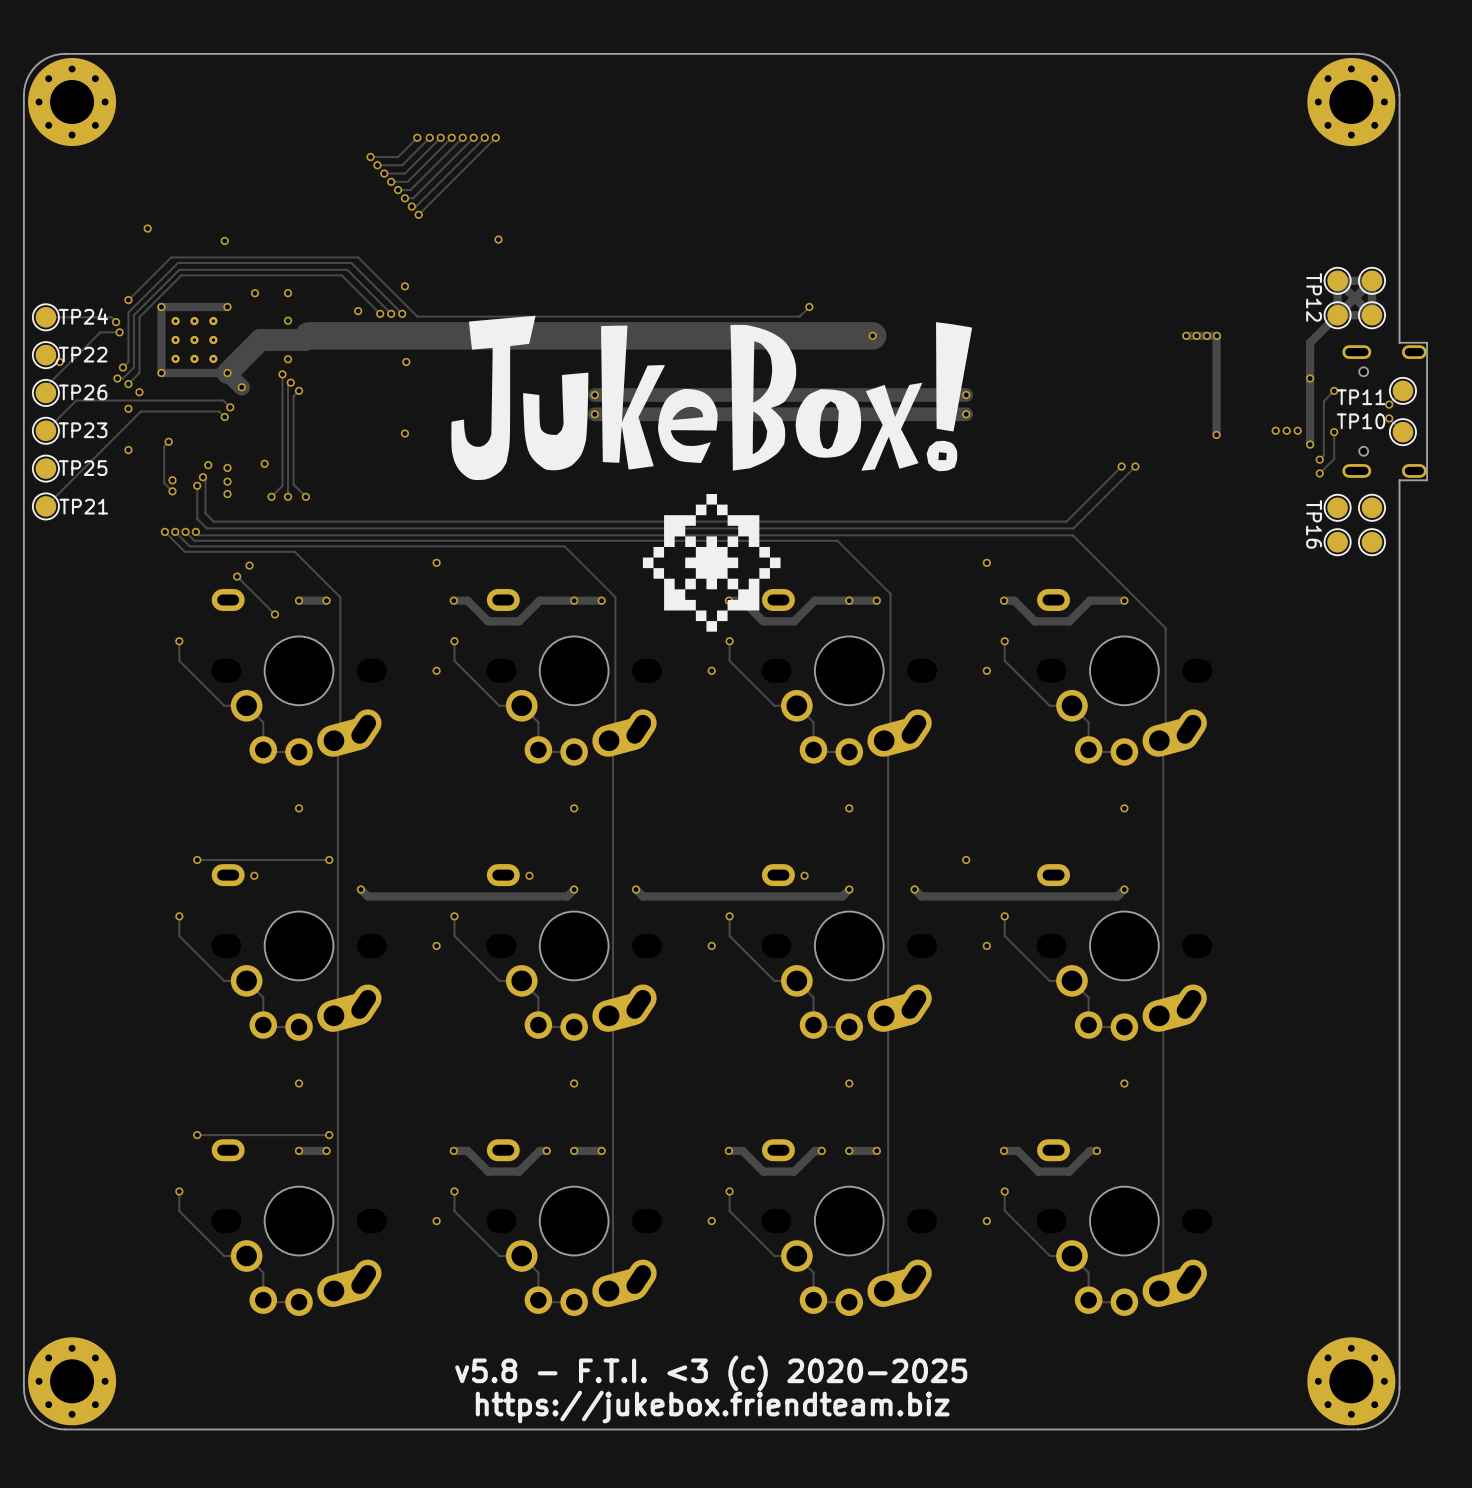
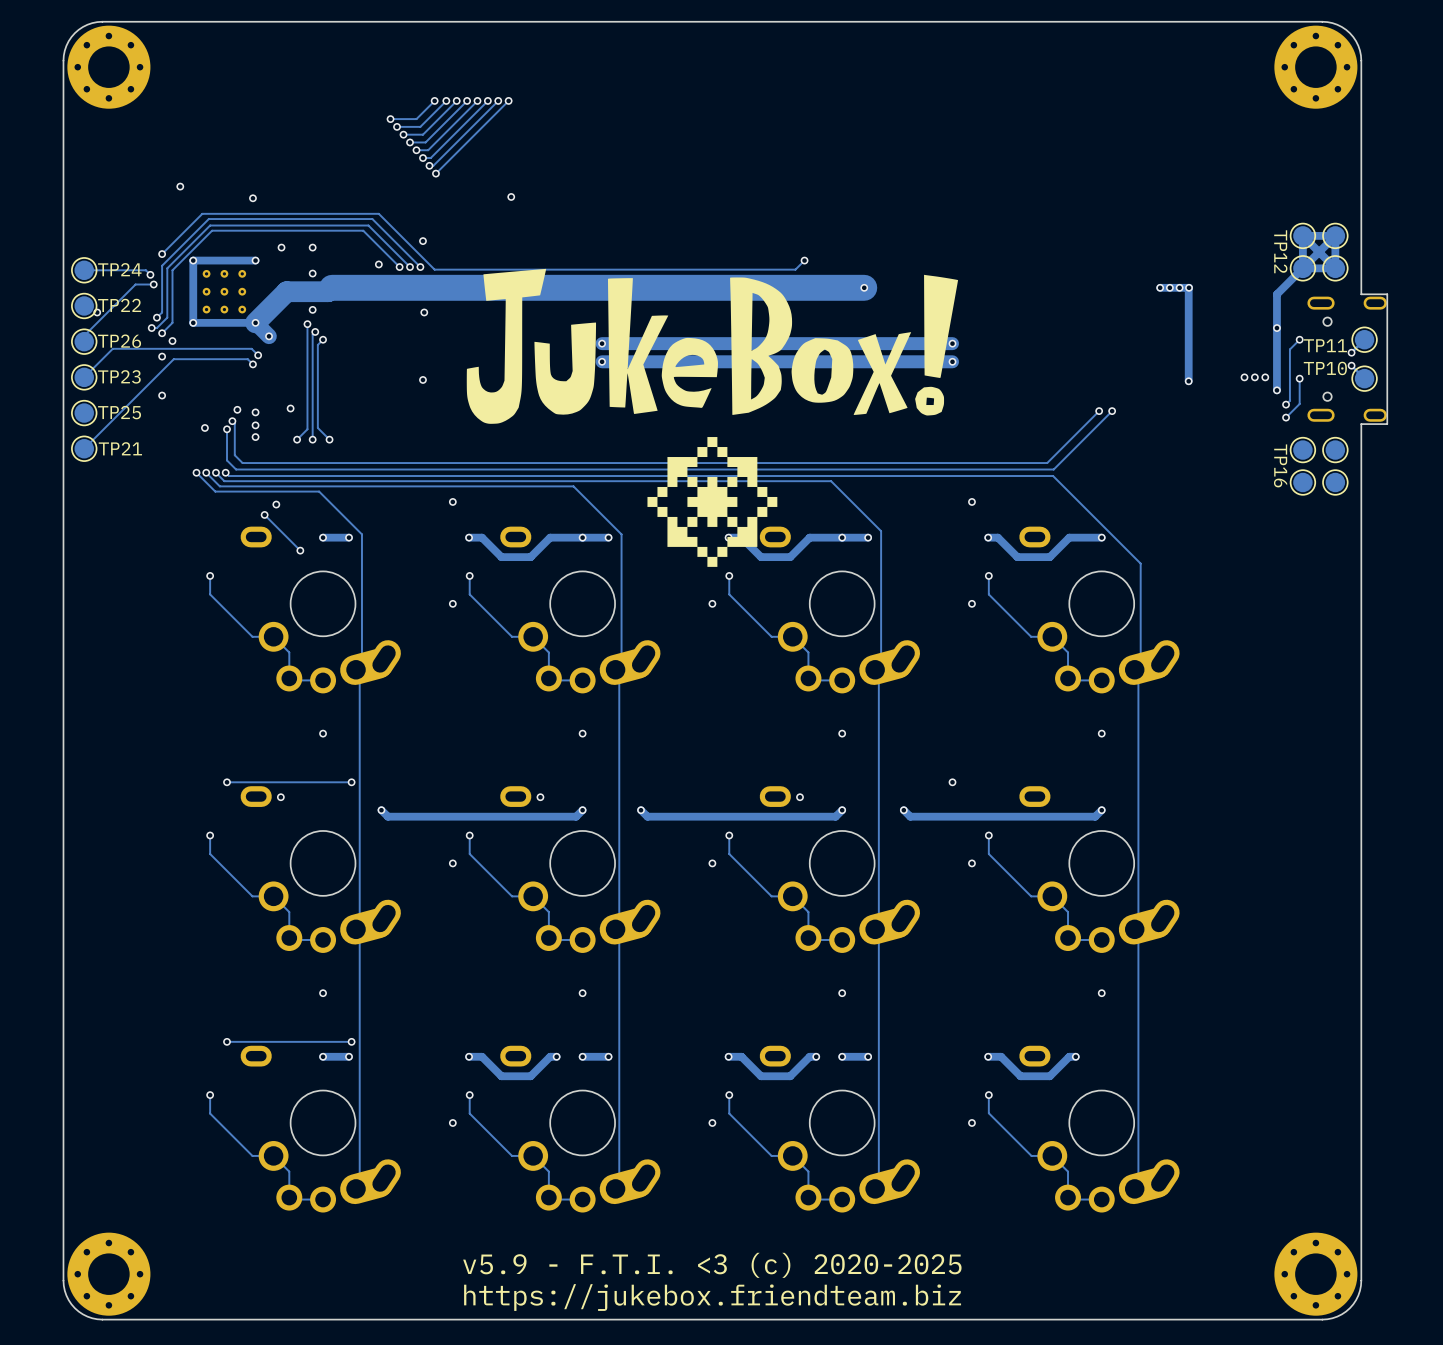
track: (168, 441) (164, 446) (164, 483) (172, 491) -> none
via: (168, 441) -> none
via: (172, 480) -> none
via: none -> (204, 427)
via: (172, 491) -> none
text: v5.8 - F.T.I. <3 (c) 2020-2025 (711, 1373) -> v5.9 - F.T.I. <3 (c) 2020-2025 (712, 1265)

